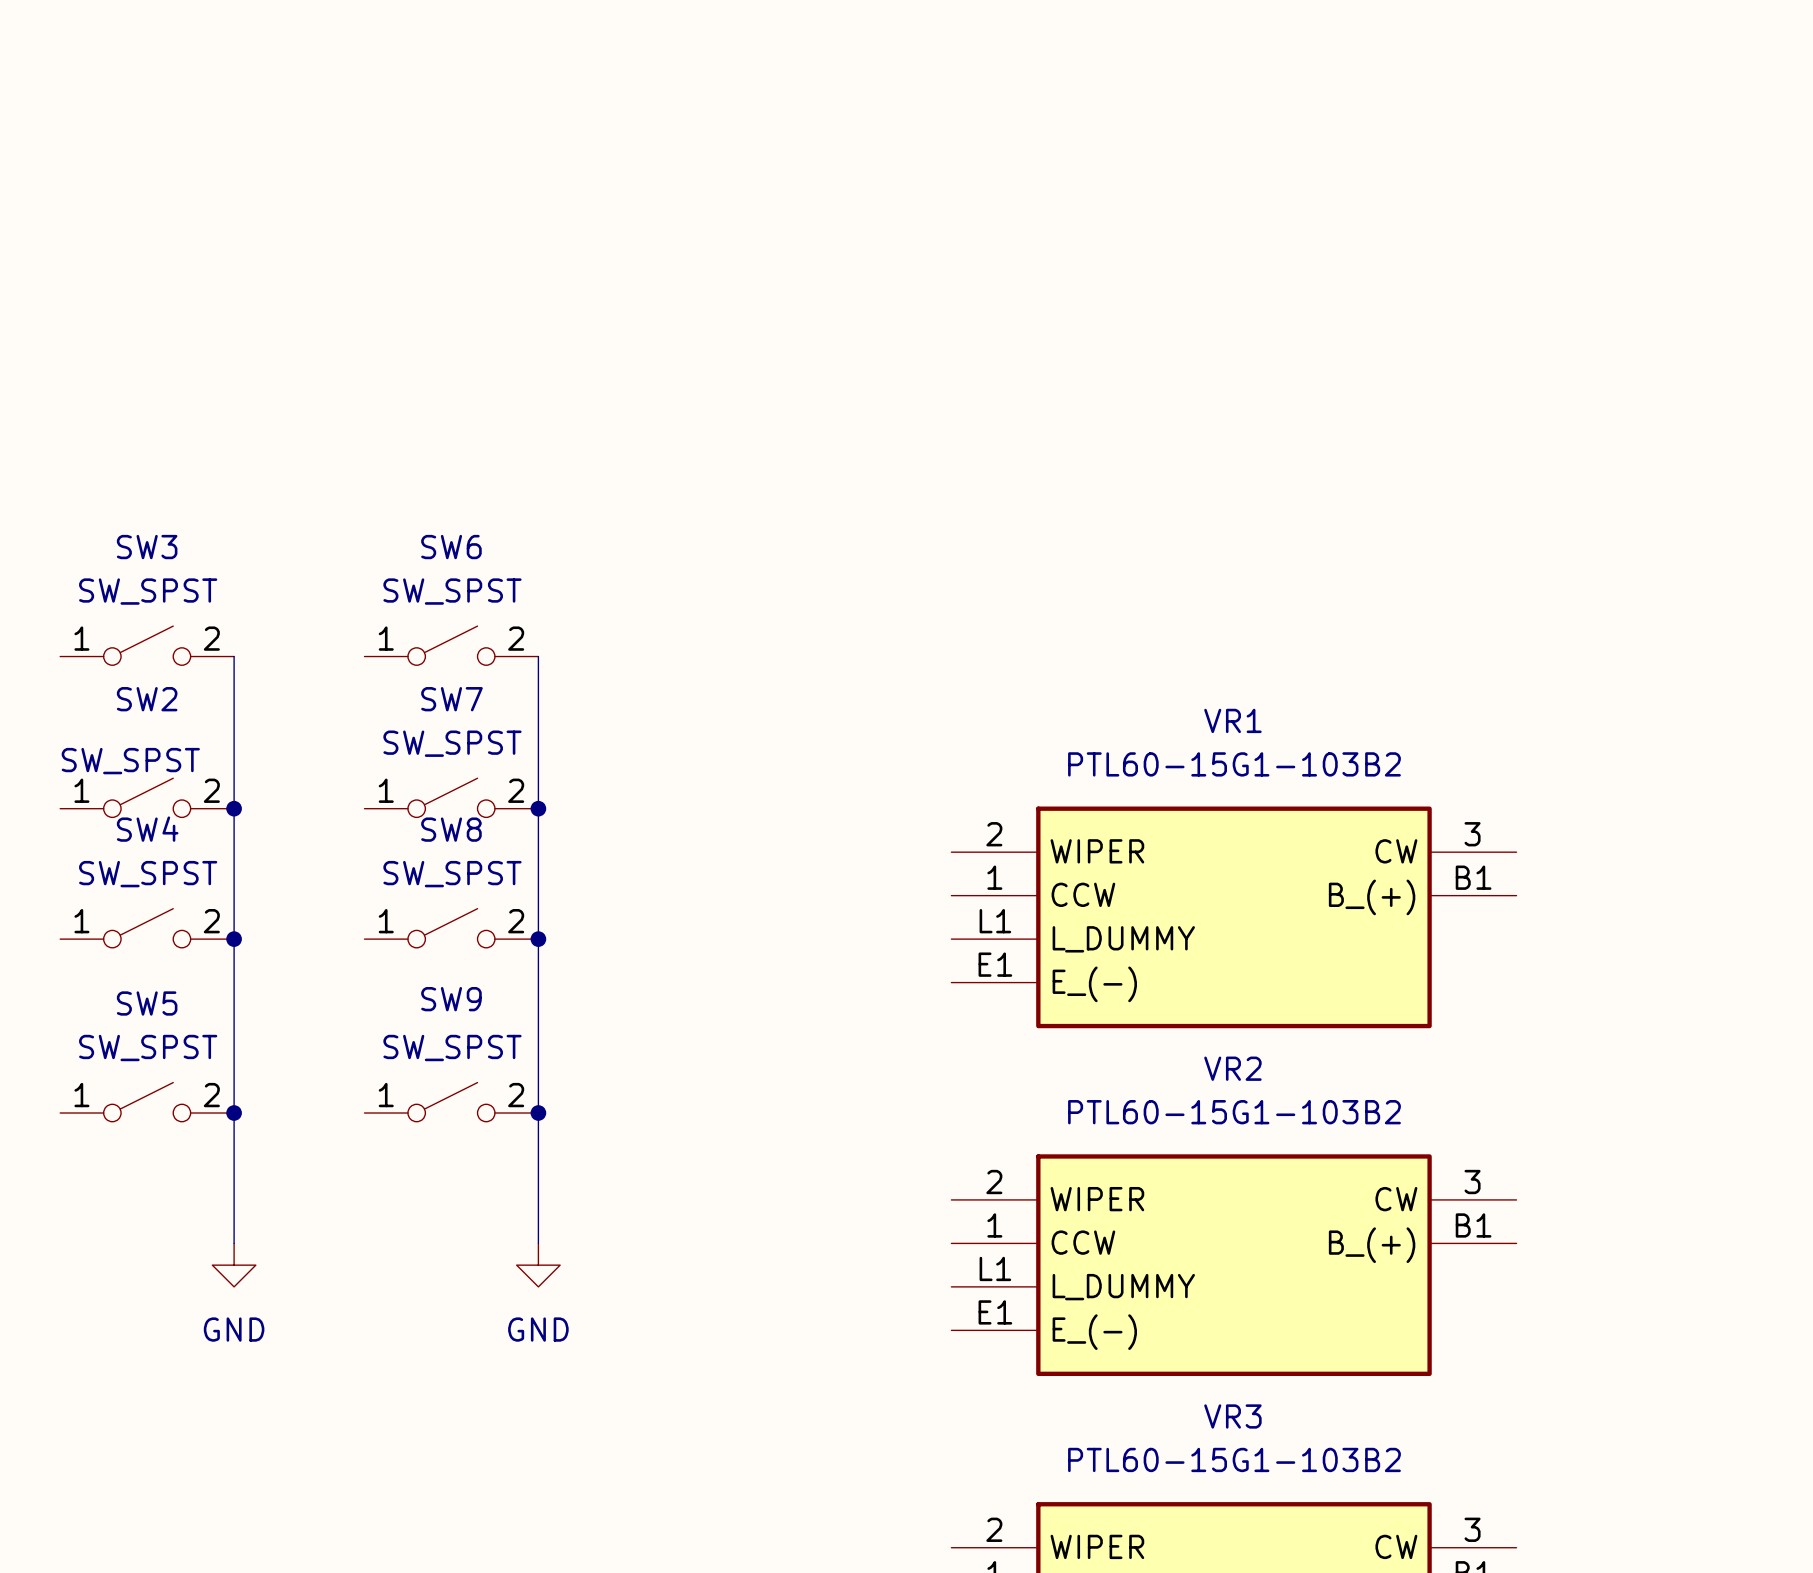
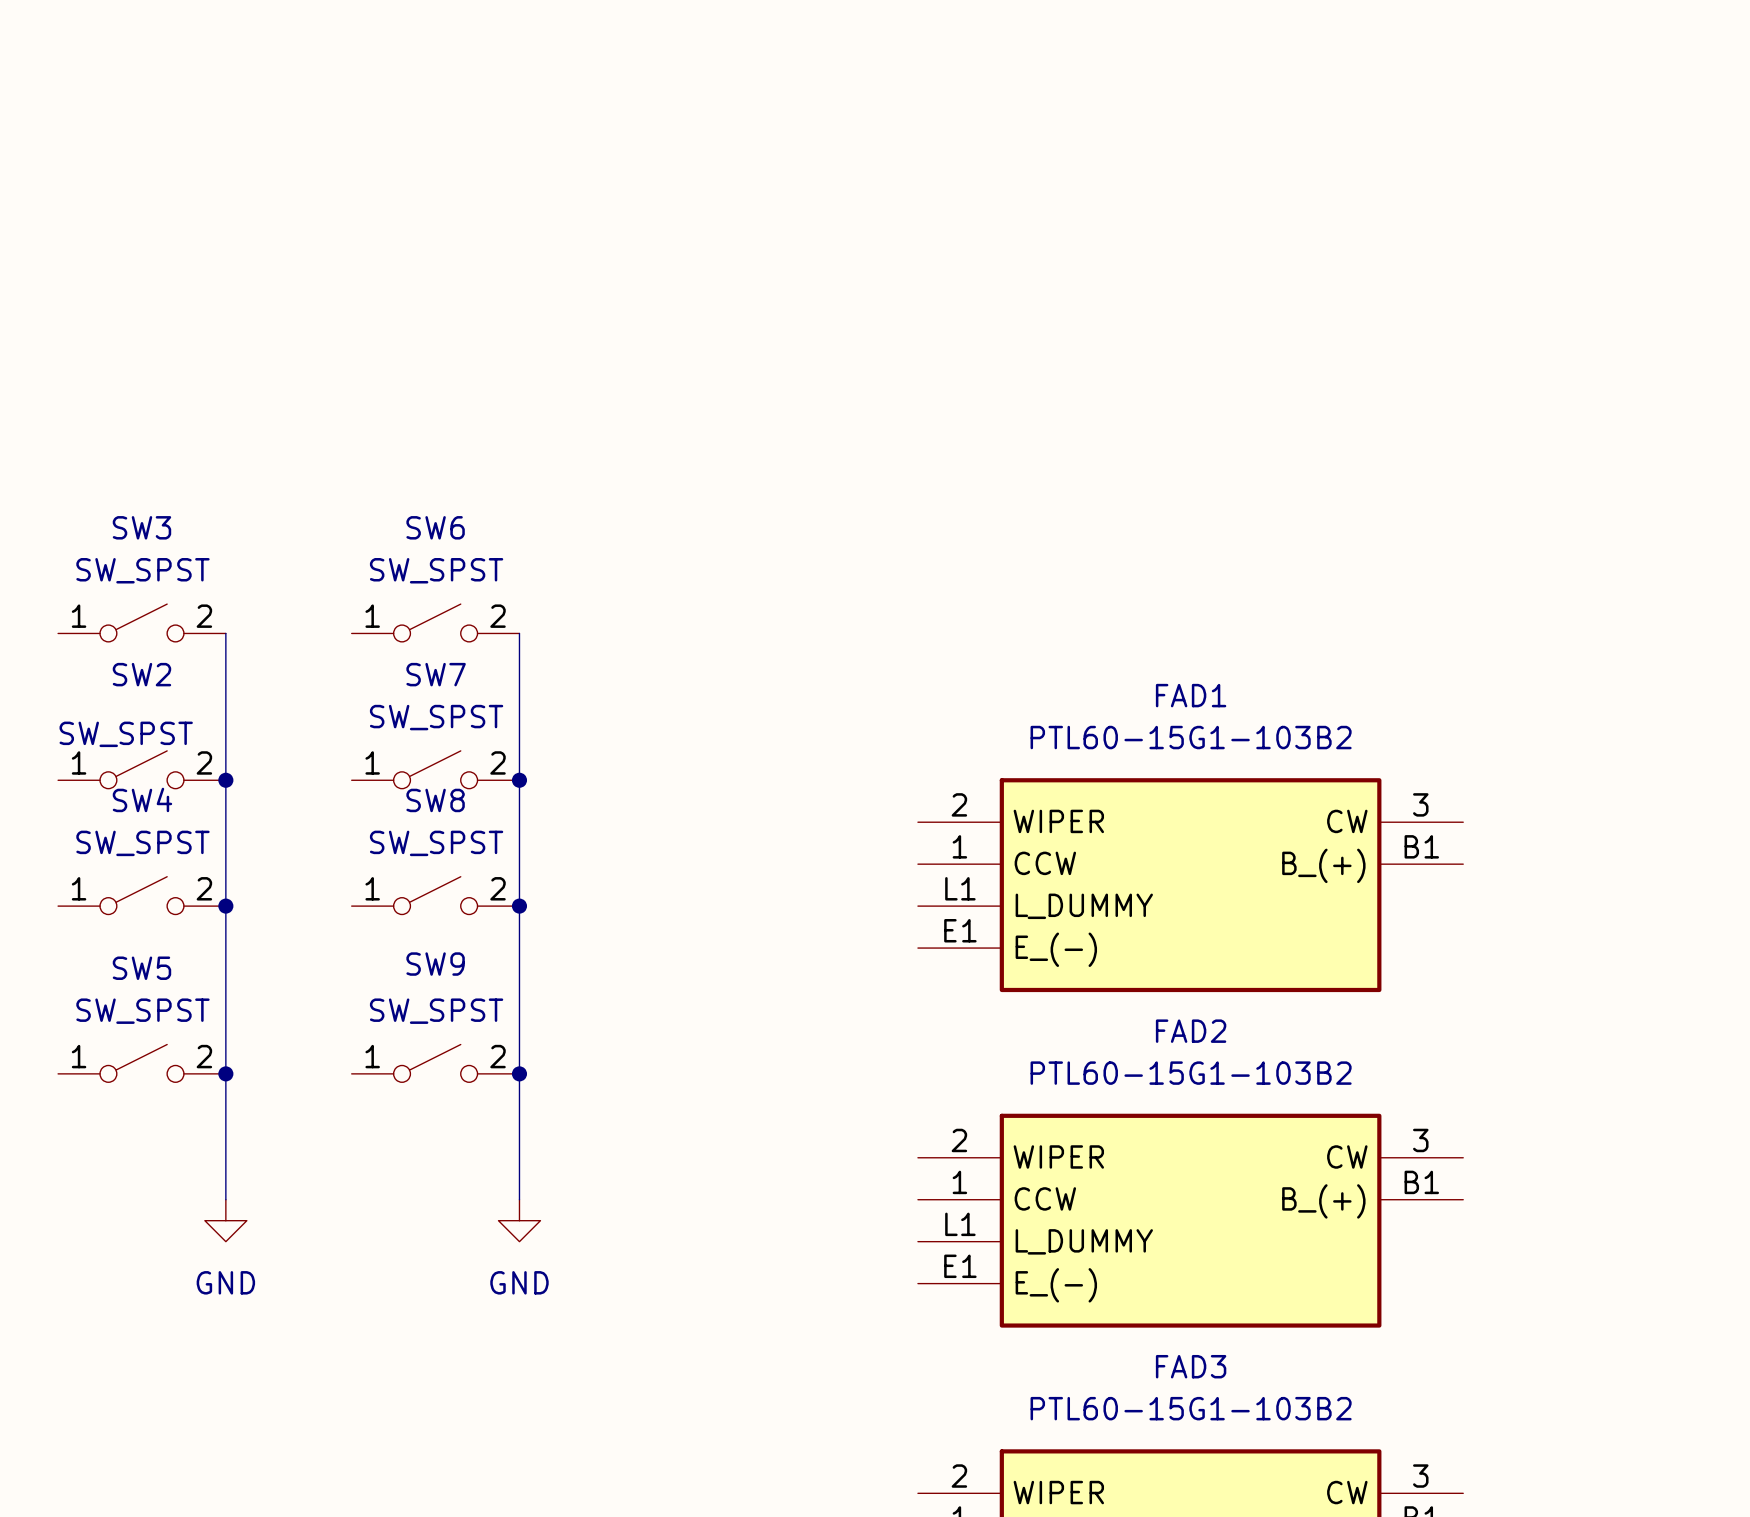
VR1 name: VR1 (1232, 720) -> FAD1 (1191, 695)
VR2 name: VR2 (1232, 1068) -> FAD2 (1191, 1031)
VR3 name: VR3 (1232, 1416) -> FAD3 (1191, 1366)

